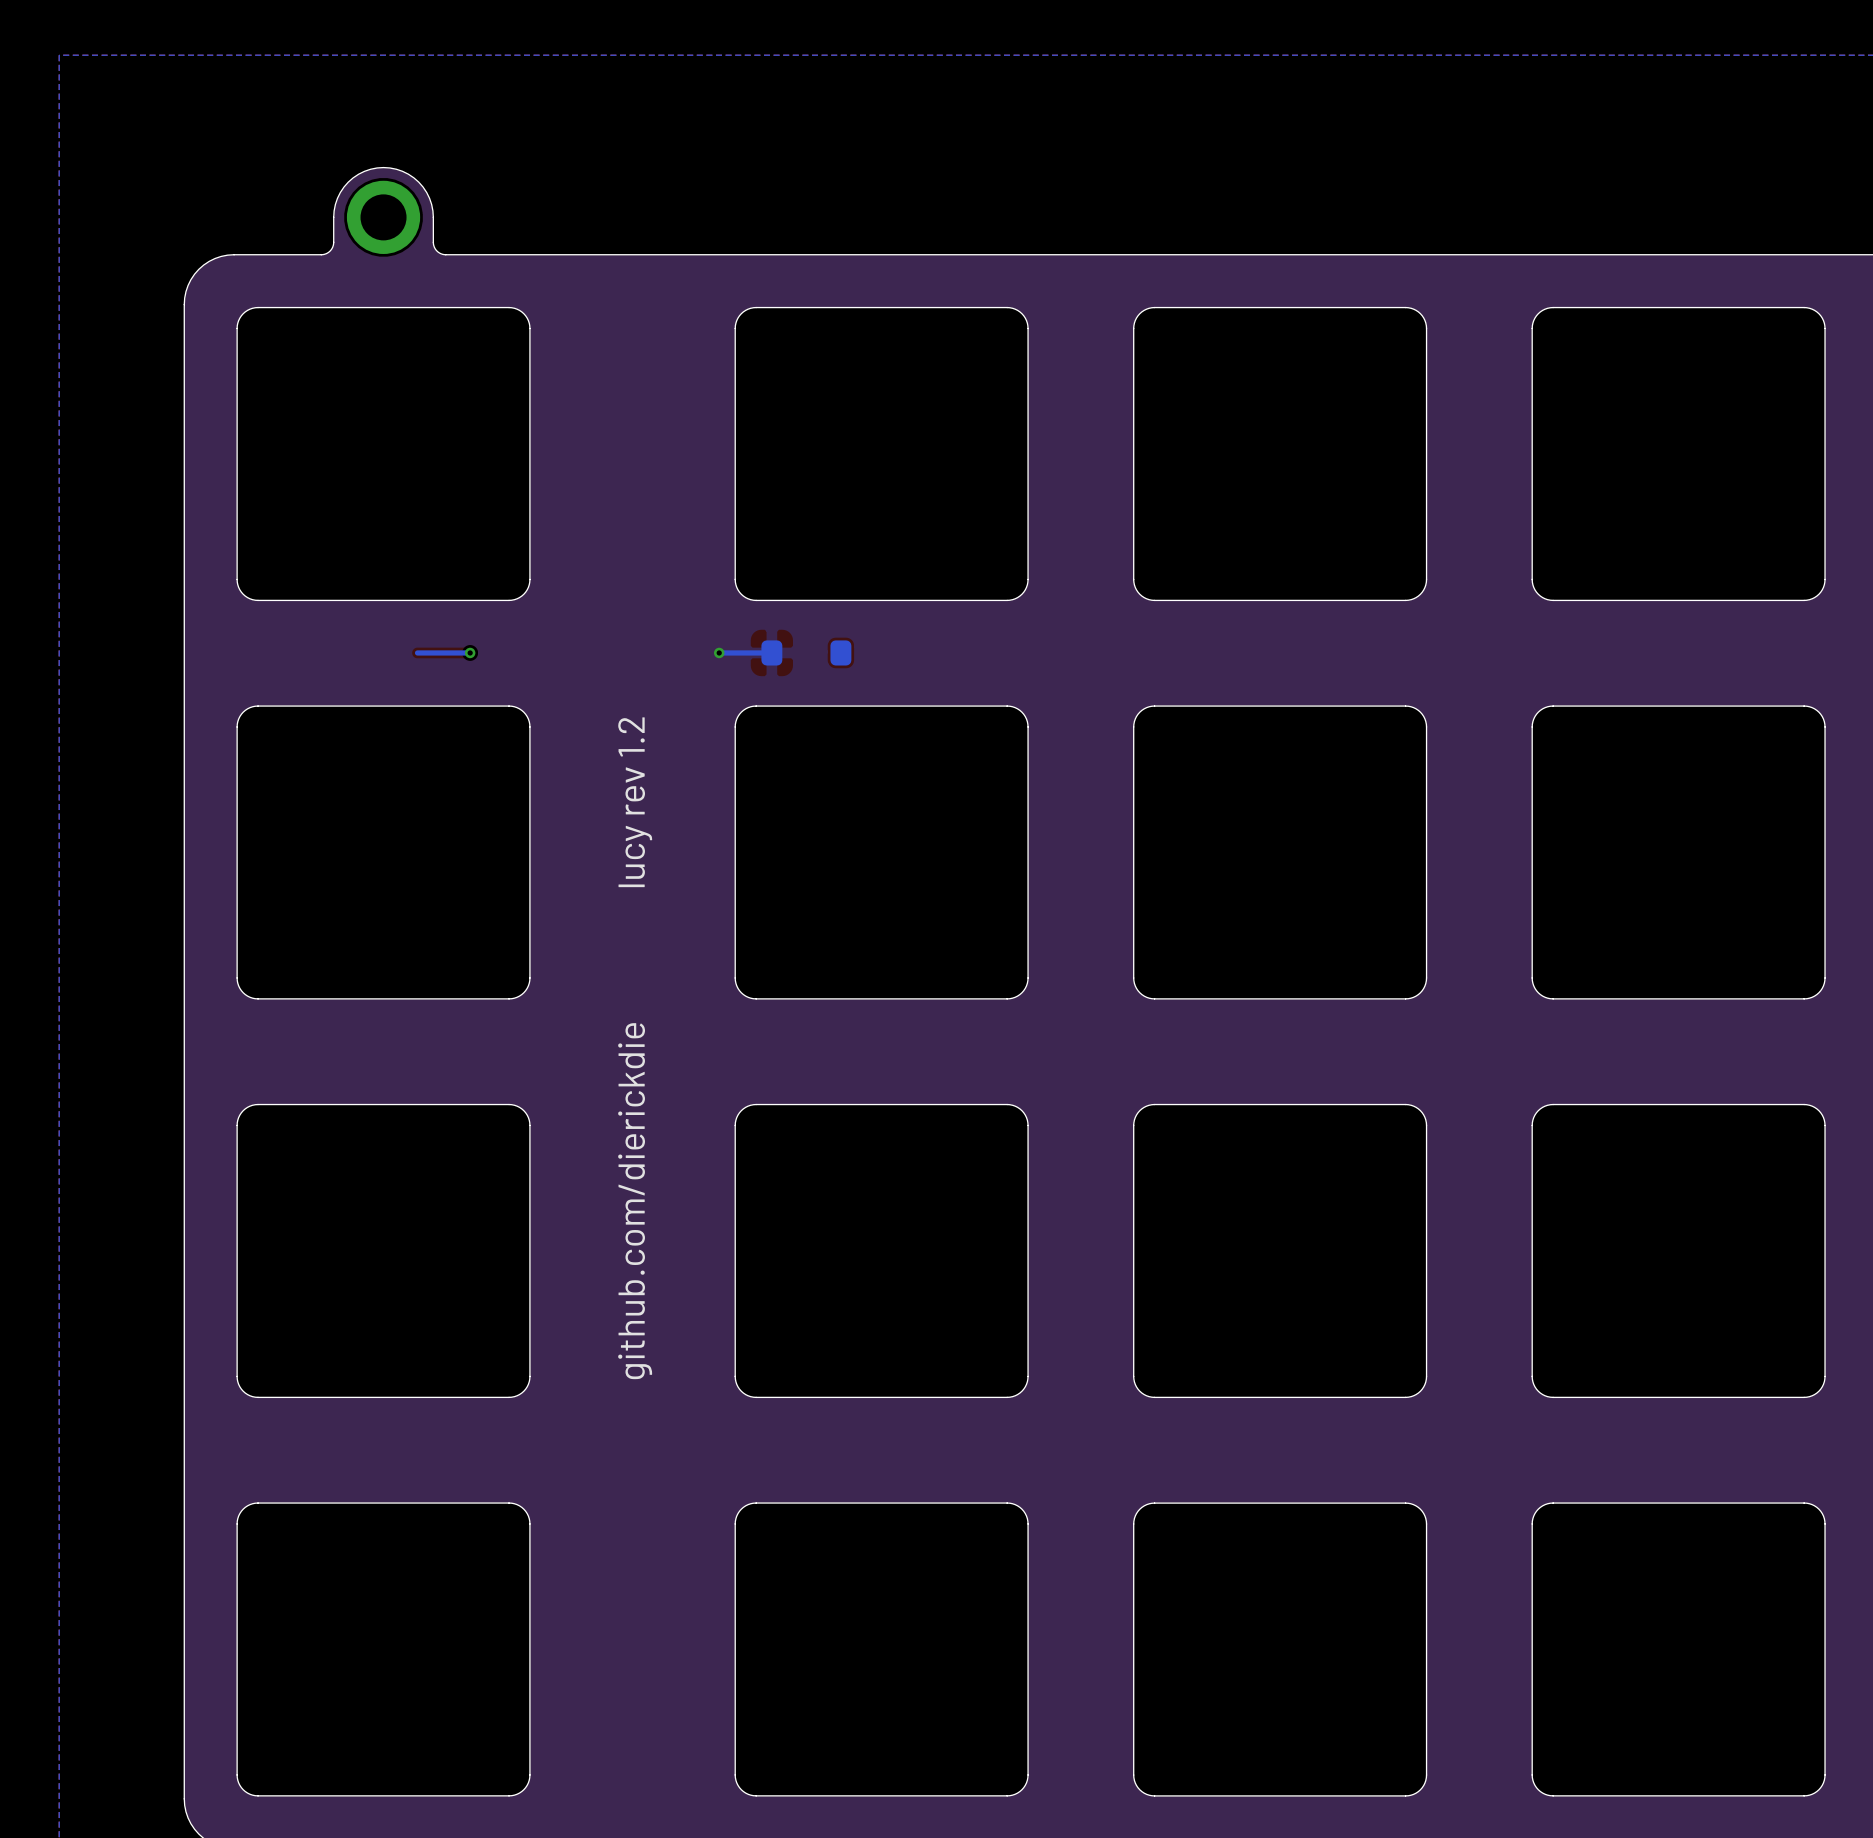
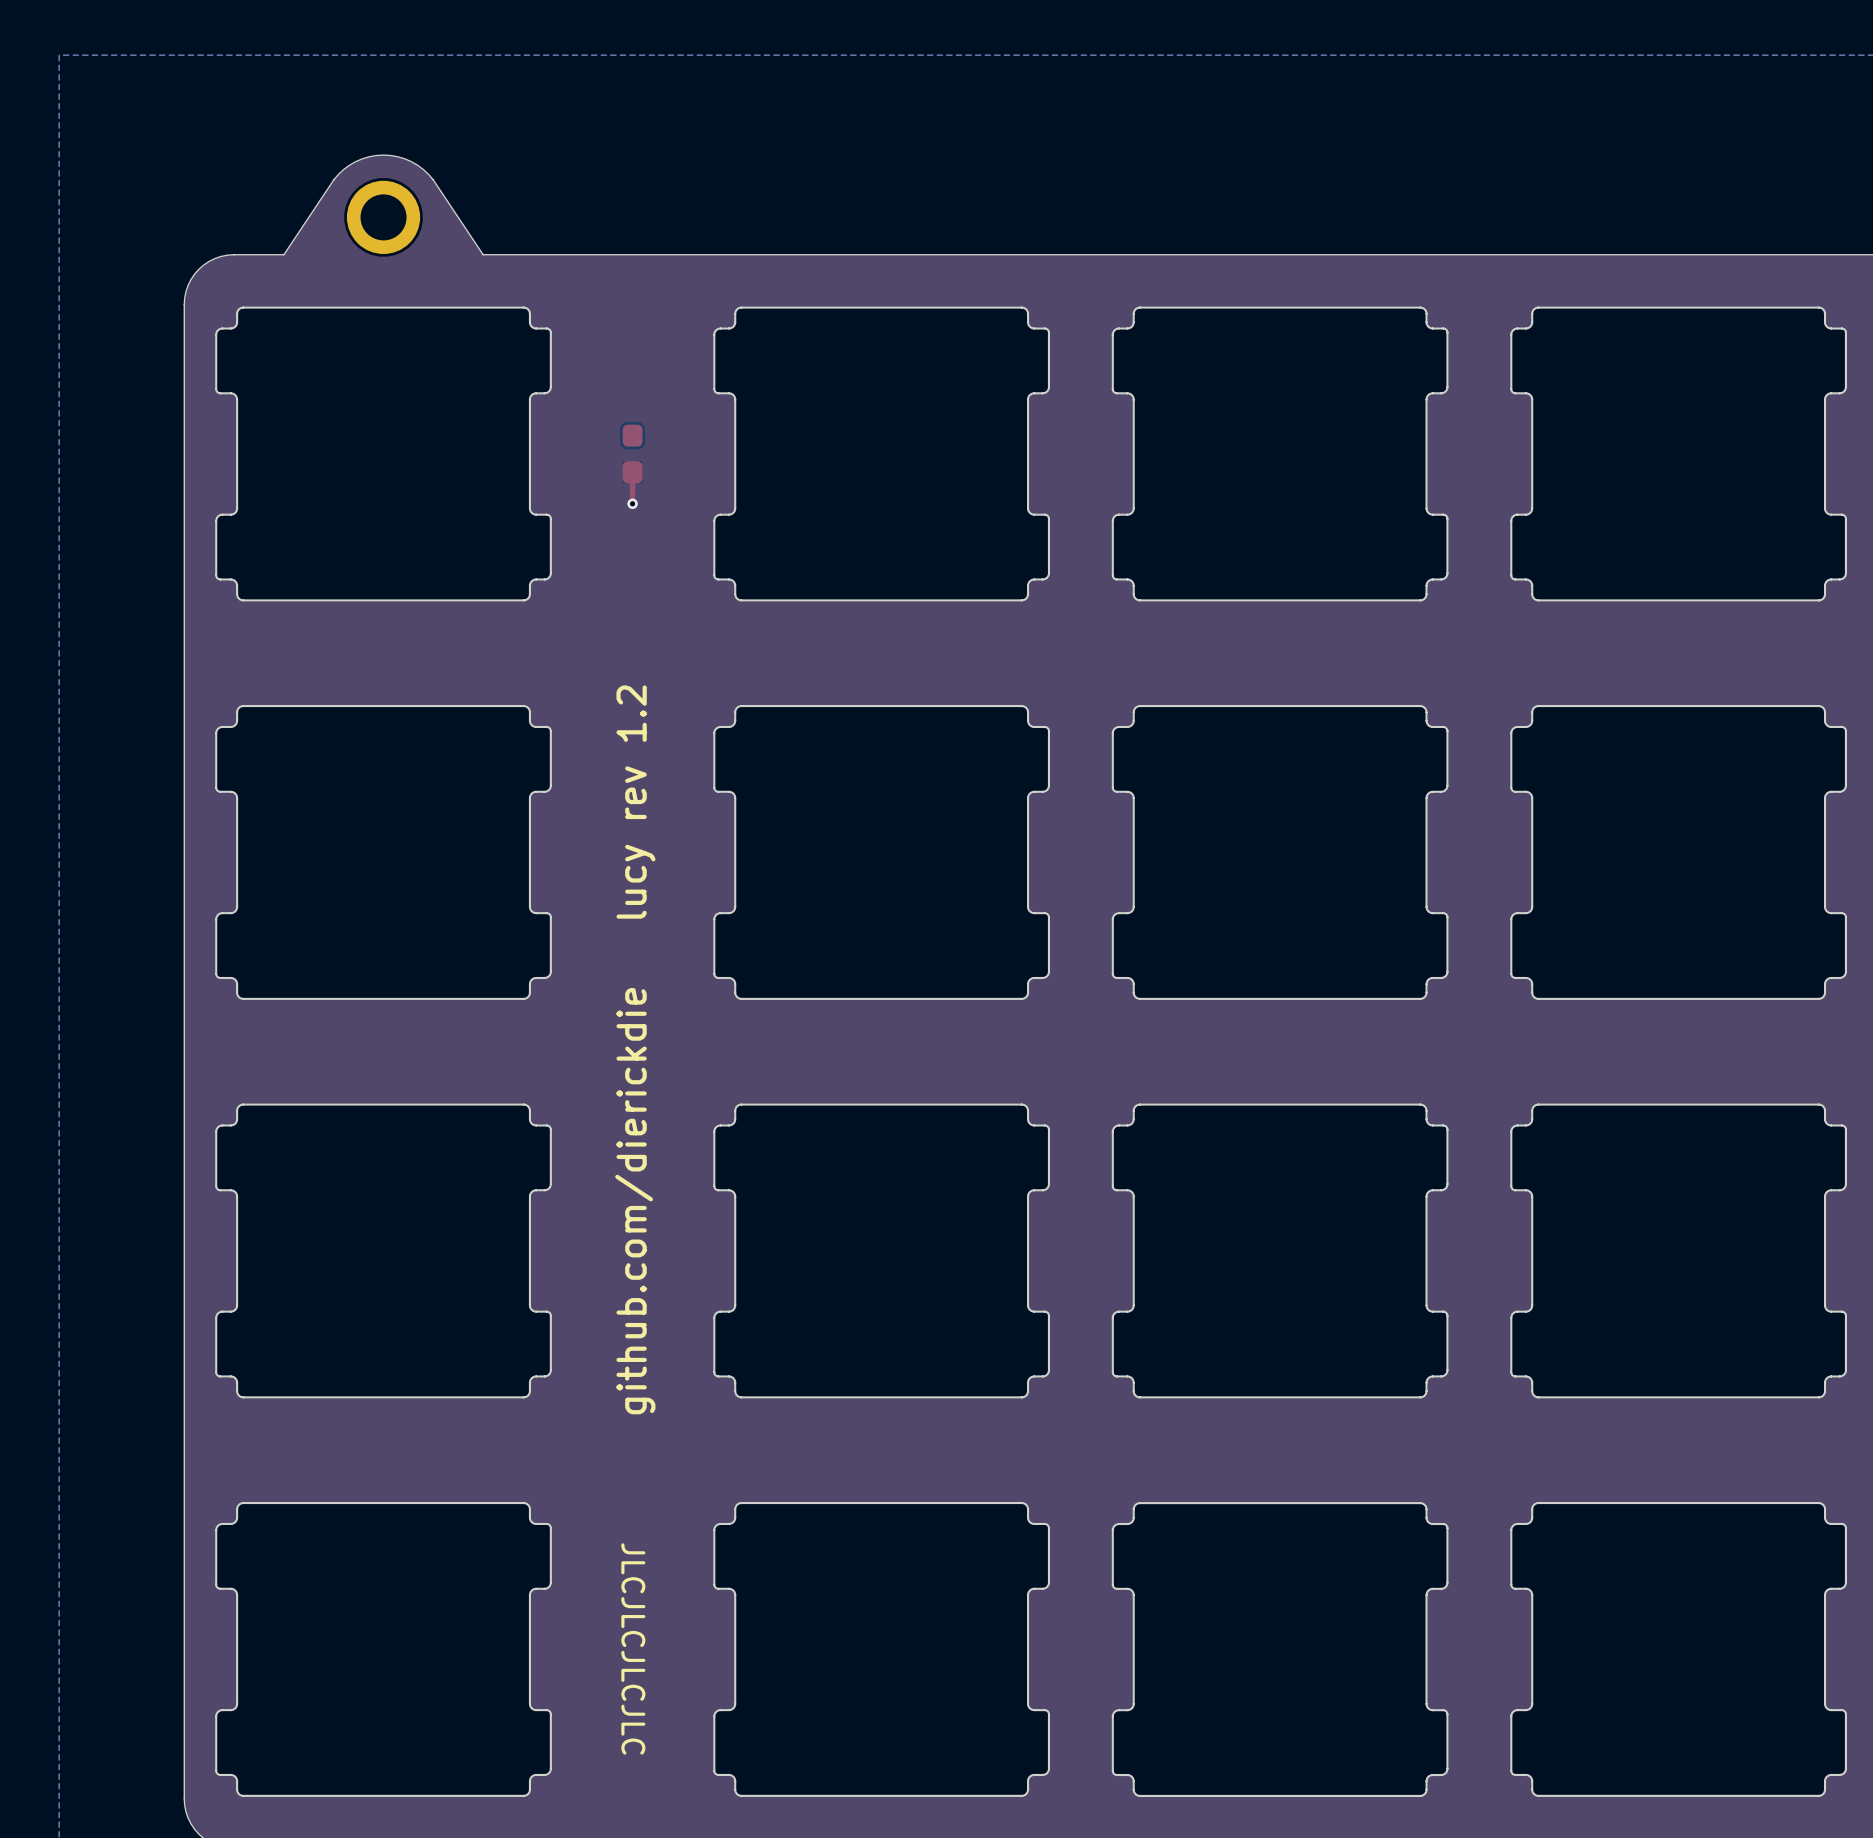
board edge: (483, 254) (445, 254) (438, 252) (433, 243) (432, 210) (426, 192) (418, 182) (408, 174) (396, 169) (383, 167) (370, 169) (358, 174) (348, 182) (340, 192) (334, 210) (333, 243) (328, 252) (321, 254) (283, 254) -> (483, 254) (428, 174) (411, 161) (397, 156) (383, 155) (369, 156) (355, 161) (338, 174) (283, 254)
drawing shape: [236, 307, 531, 601] -> [215, 306, 552, 602]
drawing shape: [734, 307, 1029, 601] -> [713, 306, 1051, 602]
drawing shape: [1133, 307, 1428, 601] -> [1111, 306, 1449, 602]
drawing shape: [1531, 307, 1826, 601] -> [1510, 306, 1848, 602]
part: none -> (632, 453)
top track: none -> (632, 472) (632, 503)
via: none -> (632, 503)
bottom track: (470, 652) (417, 652) -> none
via: (470, 652) -> none
via: (719, 652) -> none
bottom track: (771, 652) (719, 652) -> none
part: (806, 652) -> none
drawing shape: [236, 705, 531, 1000] -> [215, 705, 552, 1000]
drawing shape: [734, 705, 1029, 1000] -> [713, 705, 1051, 1000]
drawing shape: [1133, 705, 1428, 1000] -> [1111, 705, 1449, 1000]
drawing shape: [1531, 705, 1826, 1000] -> [1510, 705, 1848, 1000]
drawing shape: [236, 1104, 531, 1398] -> [215, 1103, 552, 1399]
drawing shape: [734, 1104, 1029, 1398] -> [713, 1103, 1051, 1399]
drawing shape: [1133, 1104, 1428, 1398] -> [1111, 1103, 1449, 1399]
drawing shape: [1531, 1104, 1826, 1398] -> [1510, 1103, 1848, 1399]
drawing shape: [236, 1502, 531, 1797] -> [215, 1501, 552, 1797]
drawing shape: [734, 1502, 1029, 1797] -> [713, 1501, 1051, 1797]
drawing shape: [1133, 1502, 1428, 1797] -> [1111, 1502, 1449, 1797]
drawing shape: [1531, 1502, 1826, 1797] -> [1510, 1501, 1848, 1797]
text: none -> JLCJLCJLCJLC (633, 1648)

